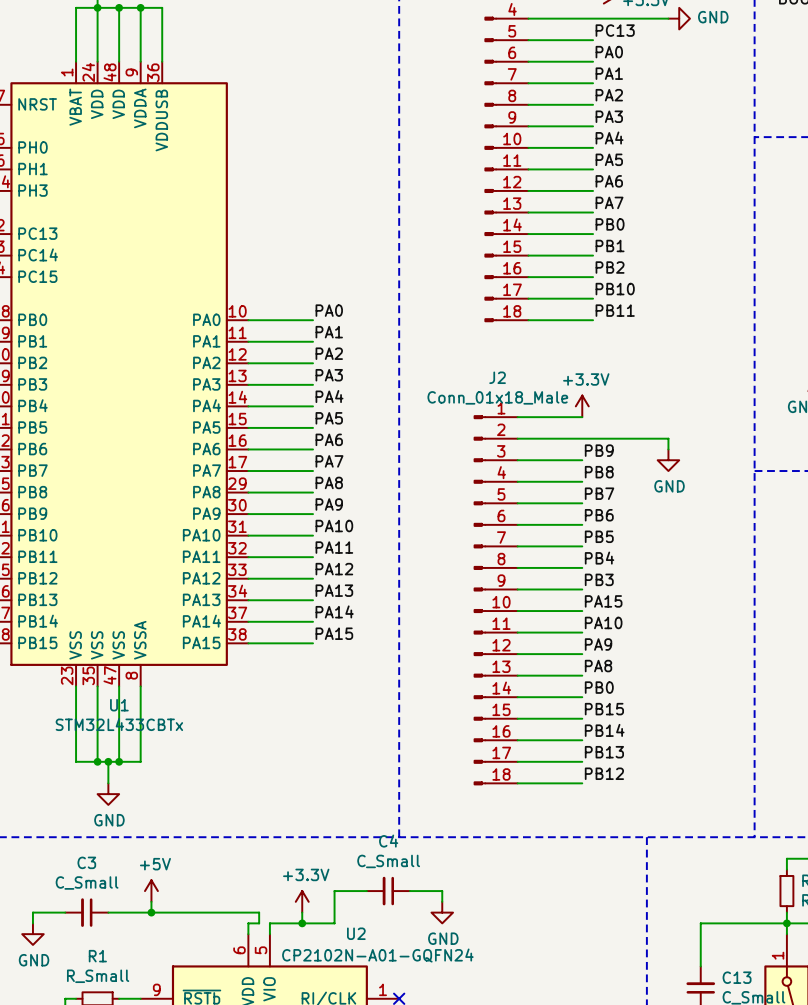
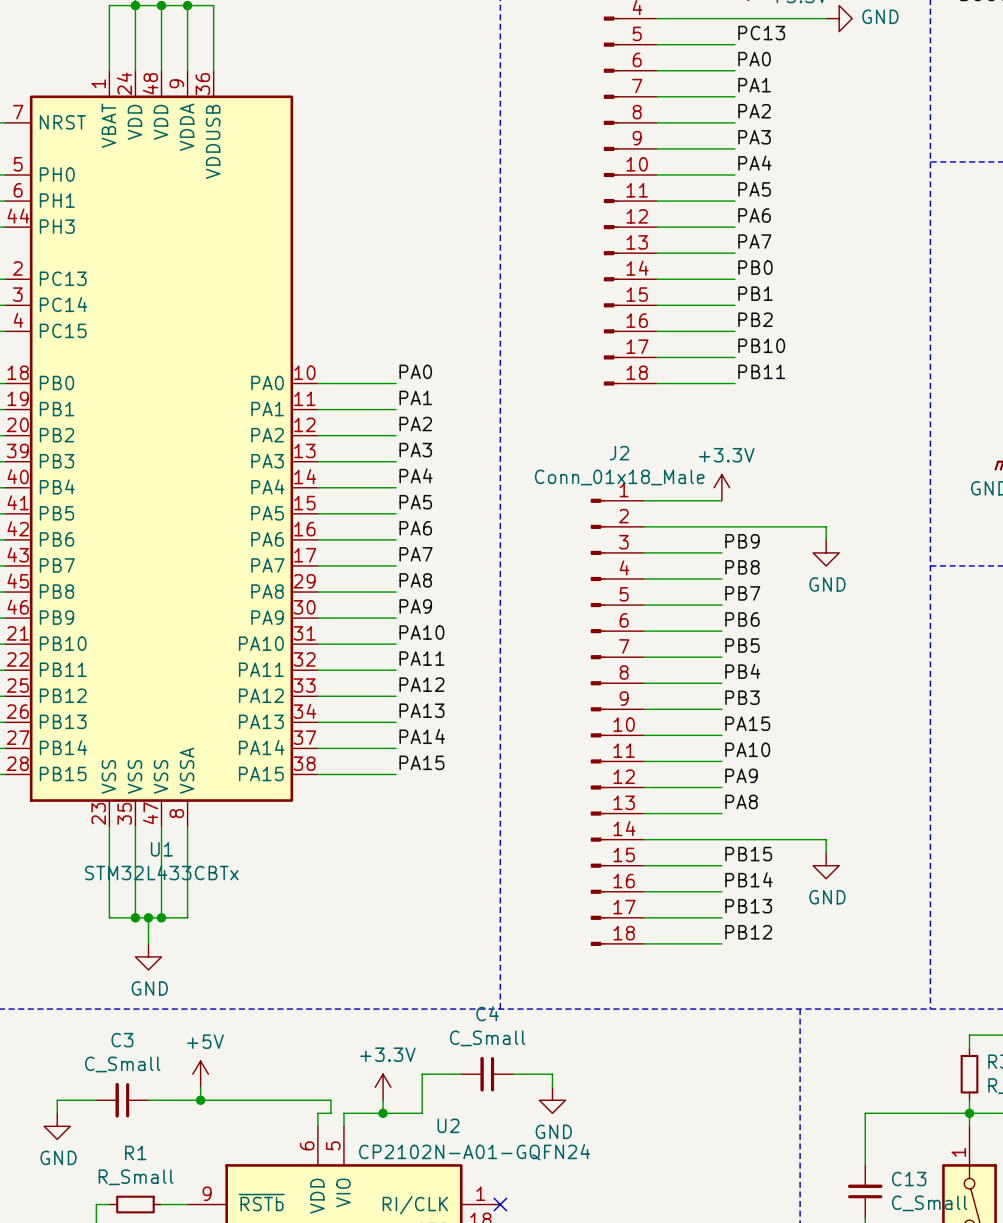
label: PB0 (599, 687) -> none
wire: none -> (721, 839) (826, 839) (826, 852)
power symbol: none -> GND (826, 865)

